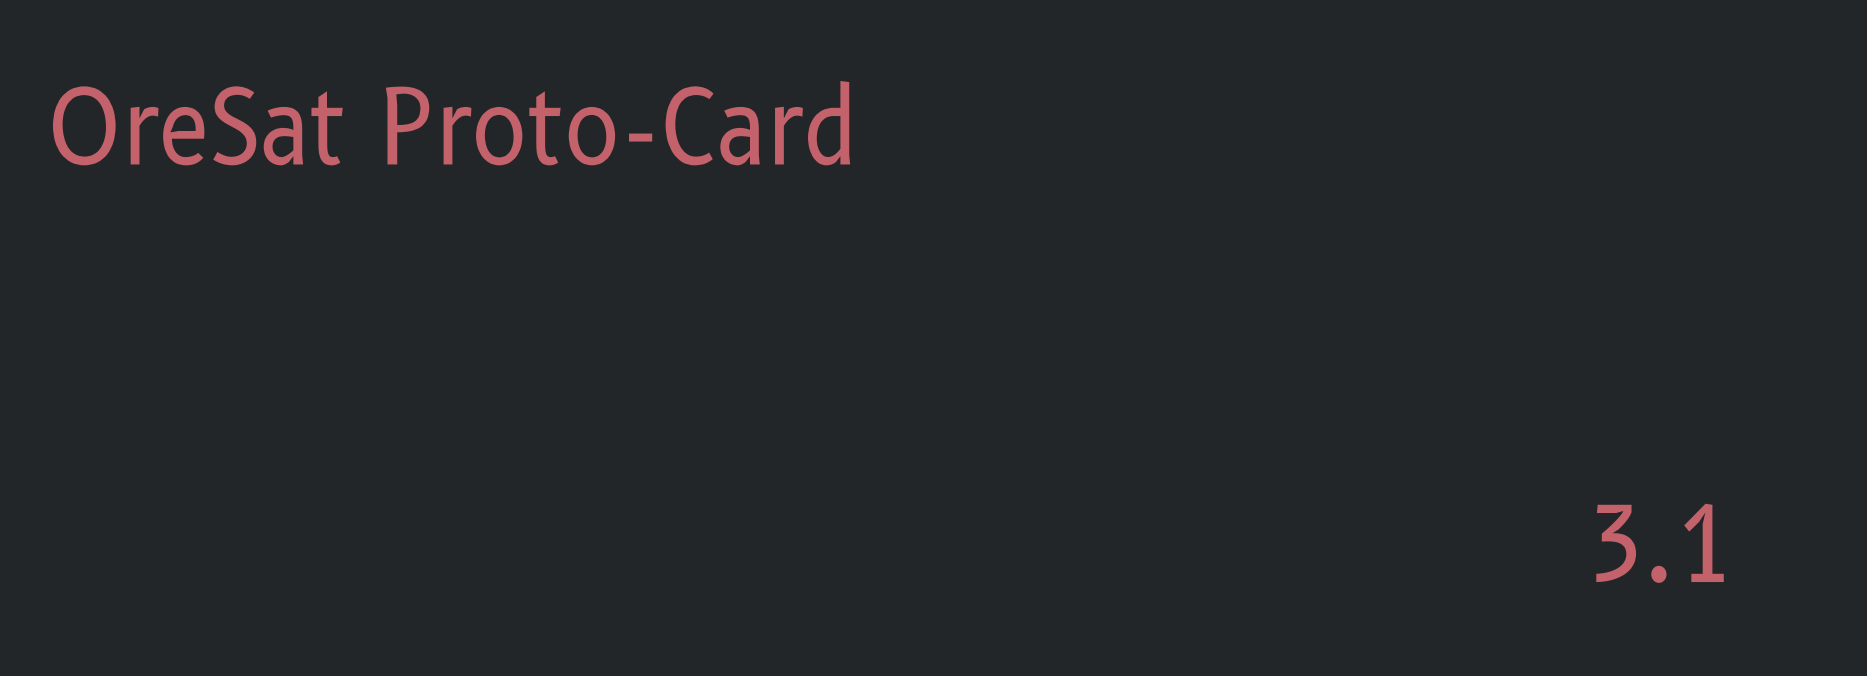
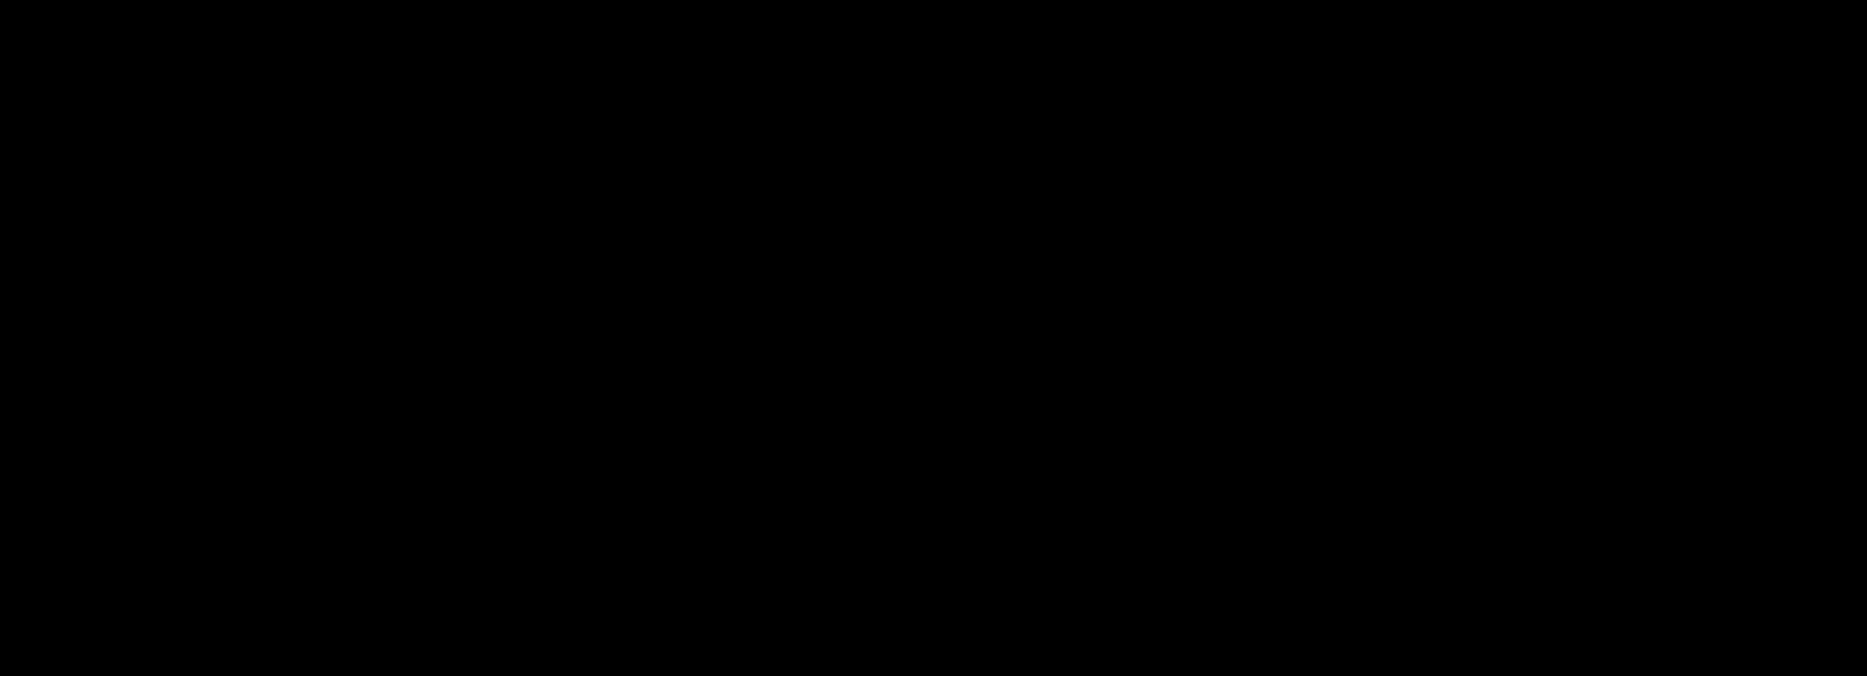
text: OreSat Proto-Card (451, 123) -> none
text: 3.1 (1660, 543) -> none

